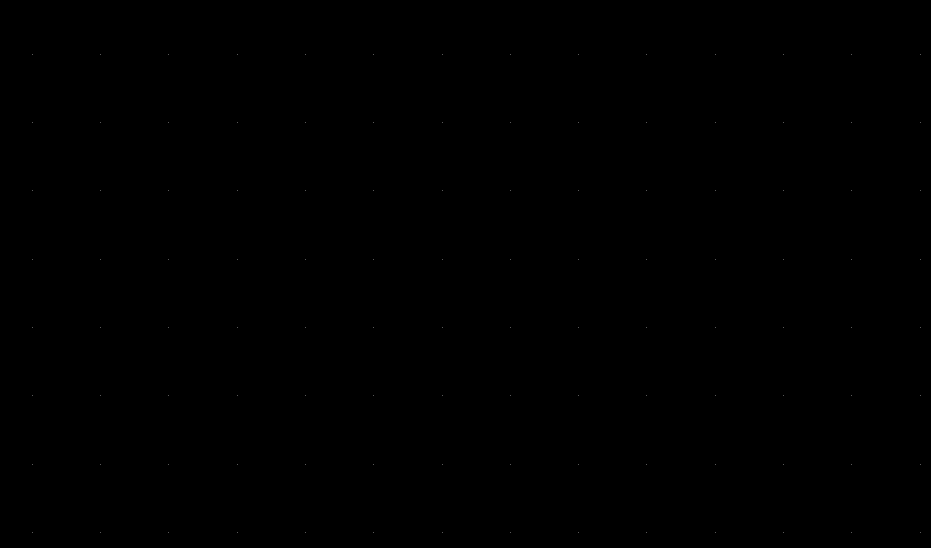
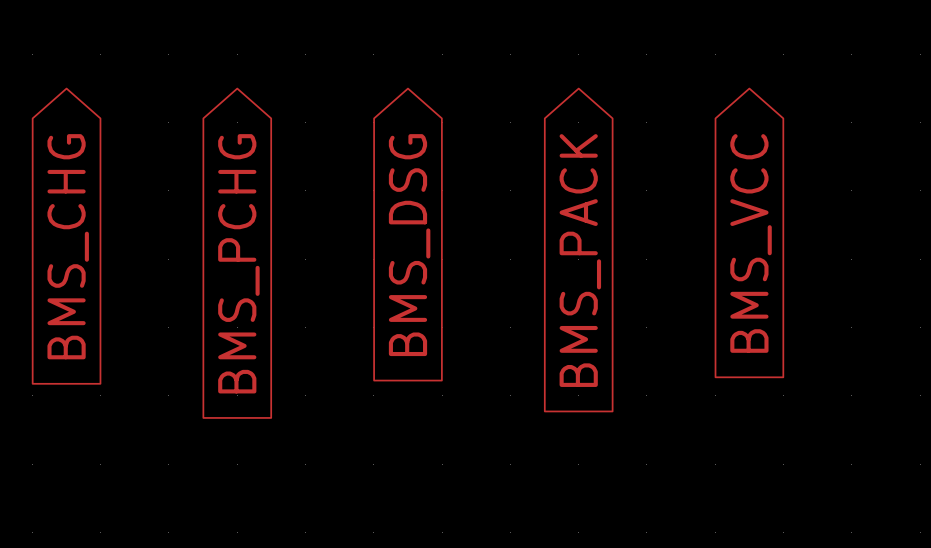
global label: none -> BMS_VCC (751, 243)
global label: none -> BMS_DSG (409, 245)
global label: none -> BMS_CHG (68, 246)
global label: none -> BMS_PACK (580, 260)
global label: none -> BMS_PCHG (238, 263)

